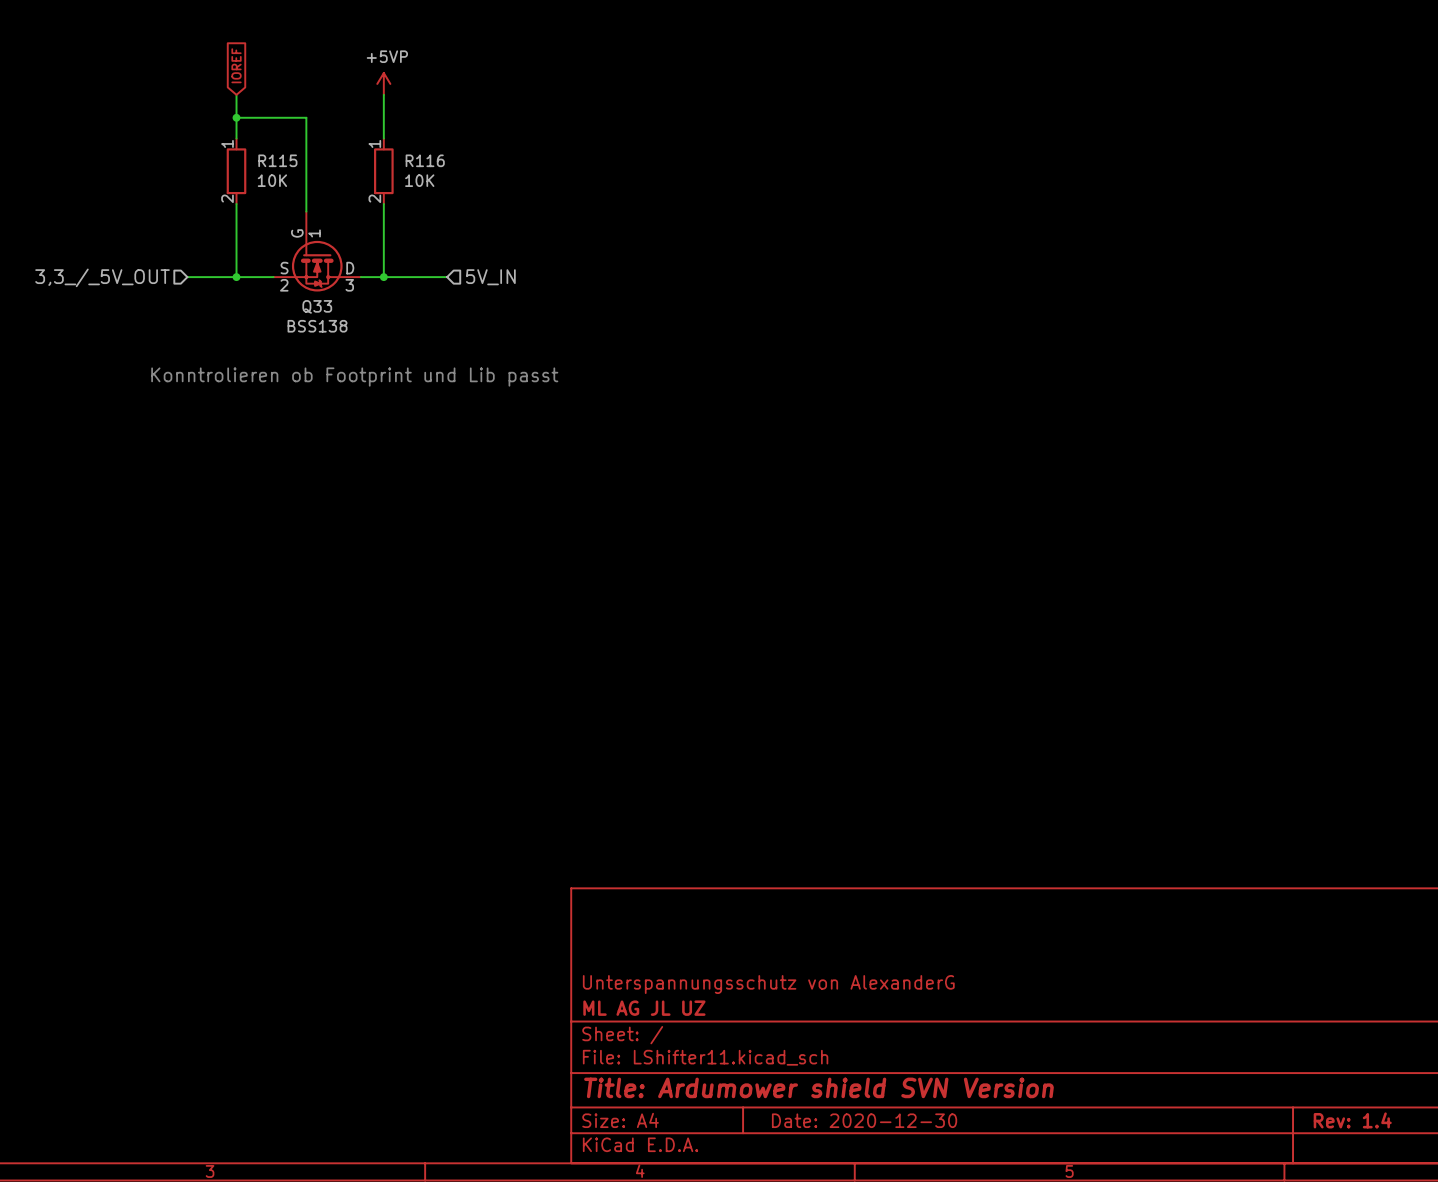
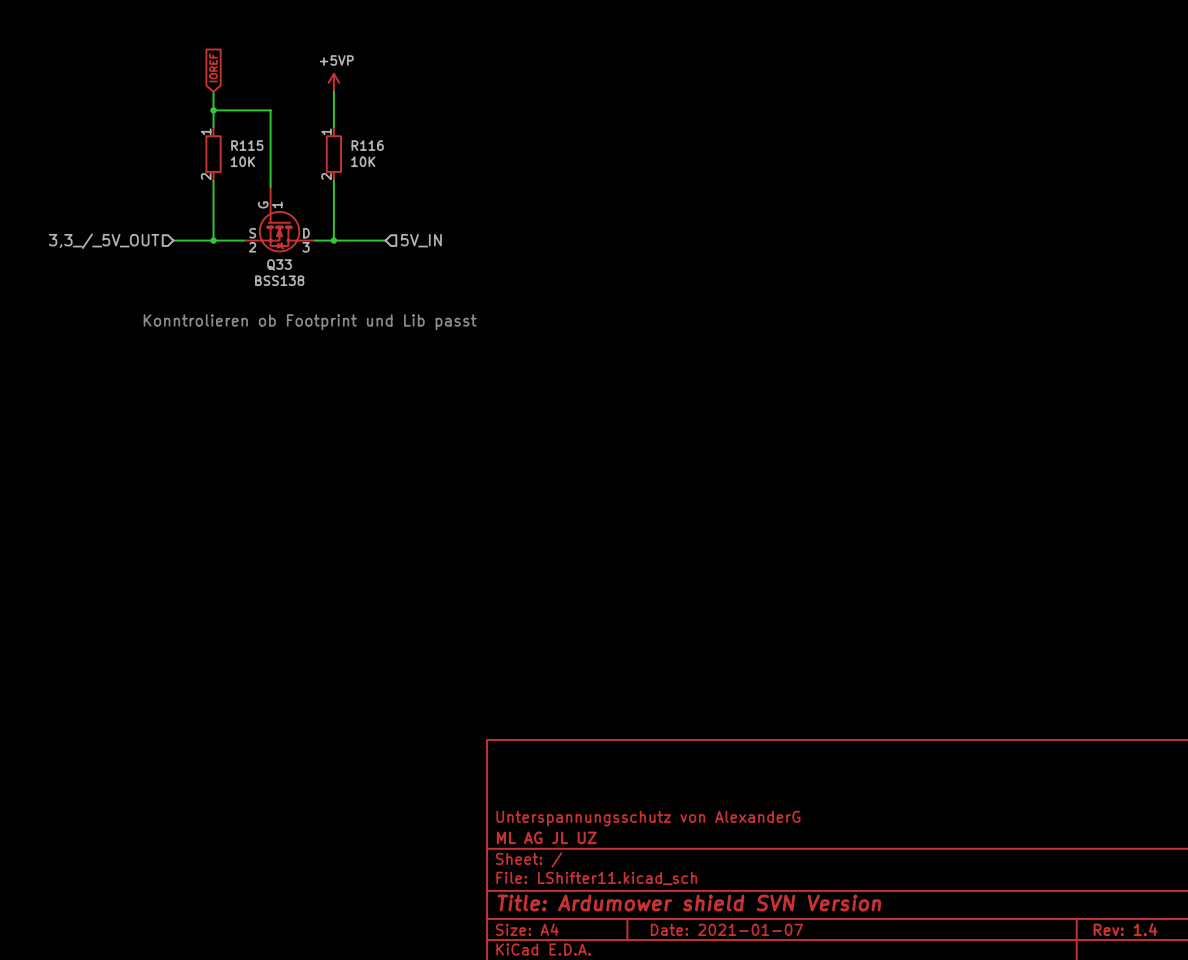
title block: Date: 2020-12-30 (864, 1120) -> Date: 2021-01-07 (726, 929)

